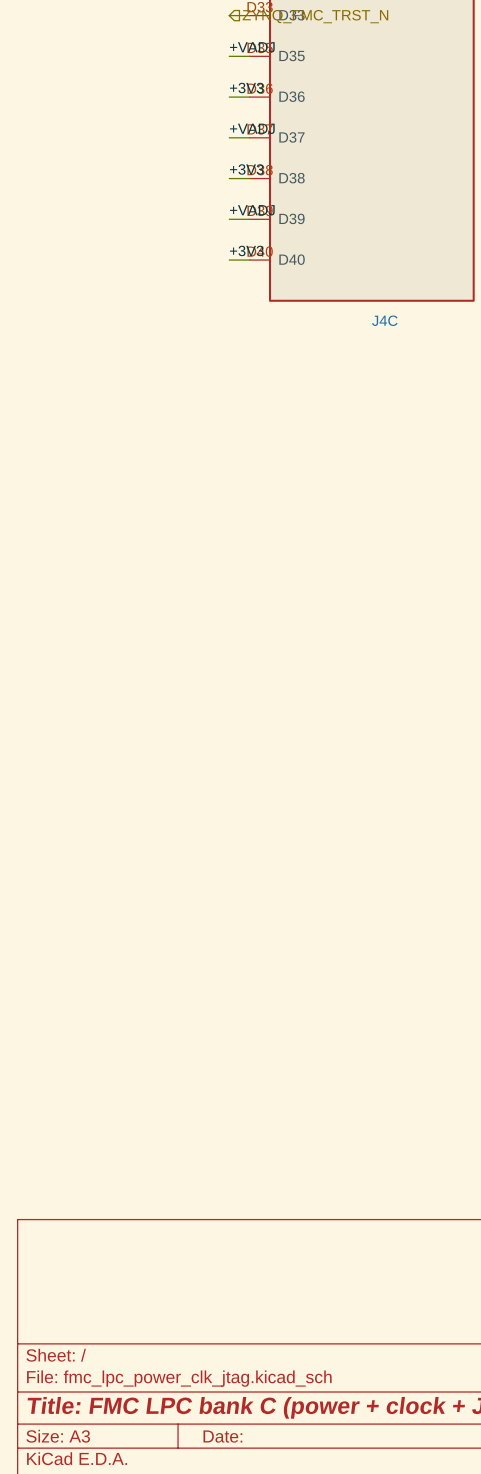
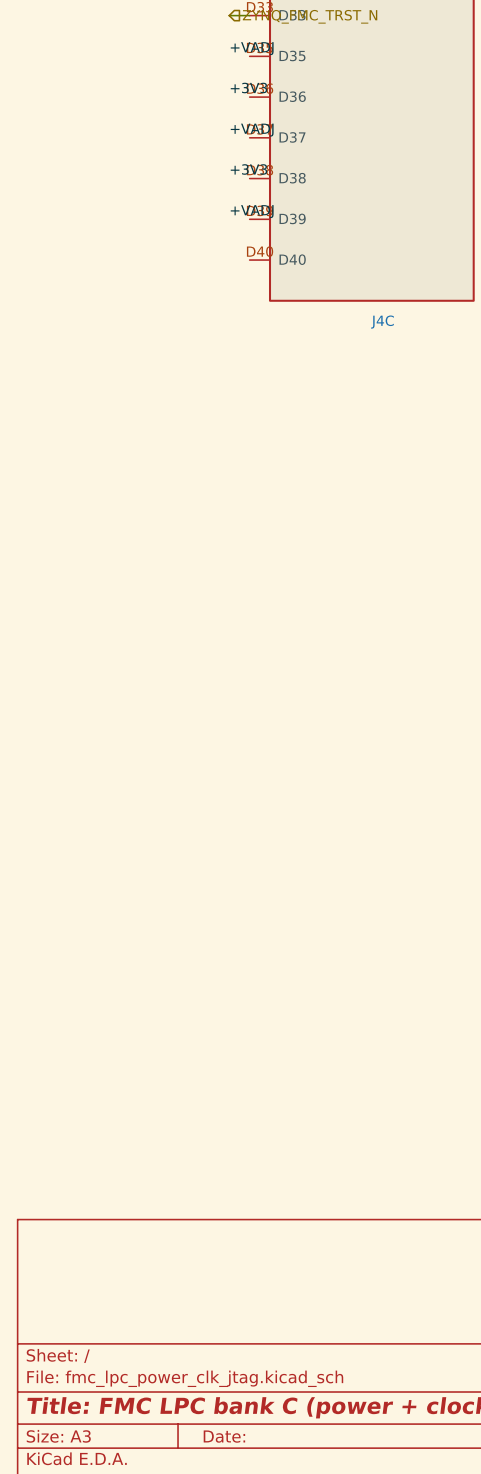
wire: (229, 56) (249, 56) -> none
wire: (229, 97) (249, 97) -> none
wire: (229, 137) (249, 137) -> none
wire: (229, 178) (249, 178) -> none
wire: (229, 219) (249, 219) -> none
label: +3V3 (246, 250) -> none
wire: (229, 260) (249, 260) -> none

